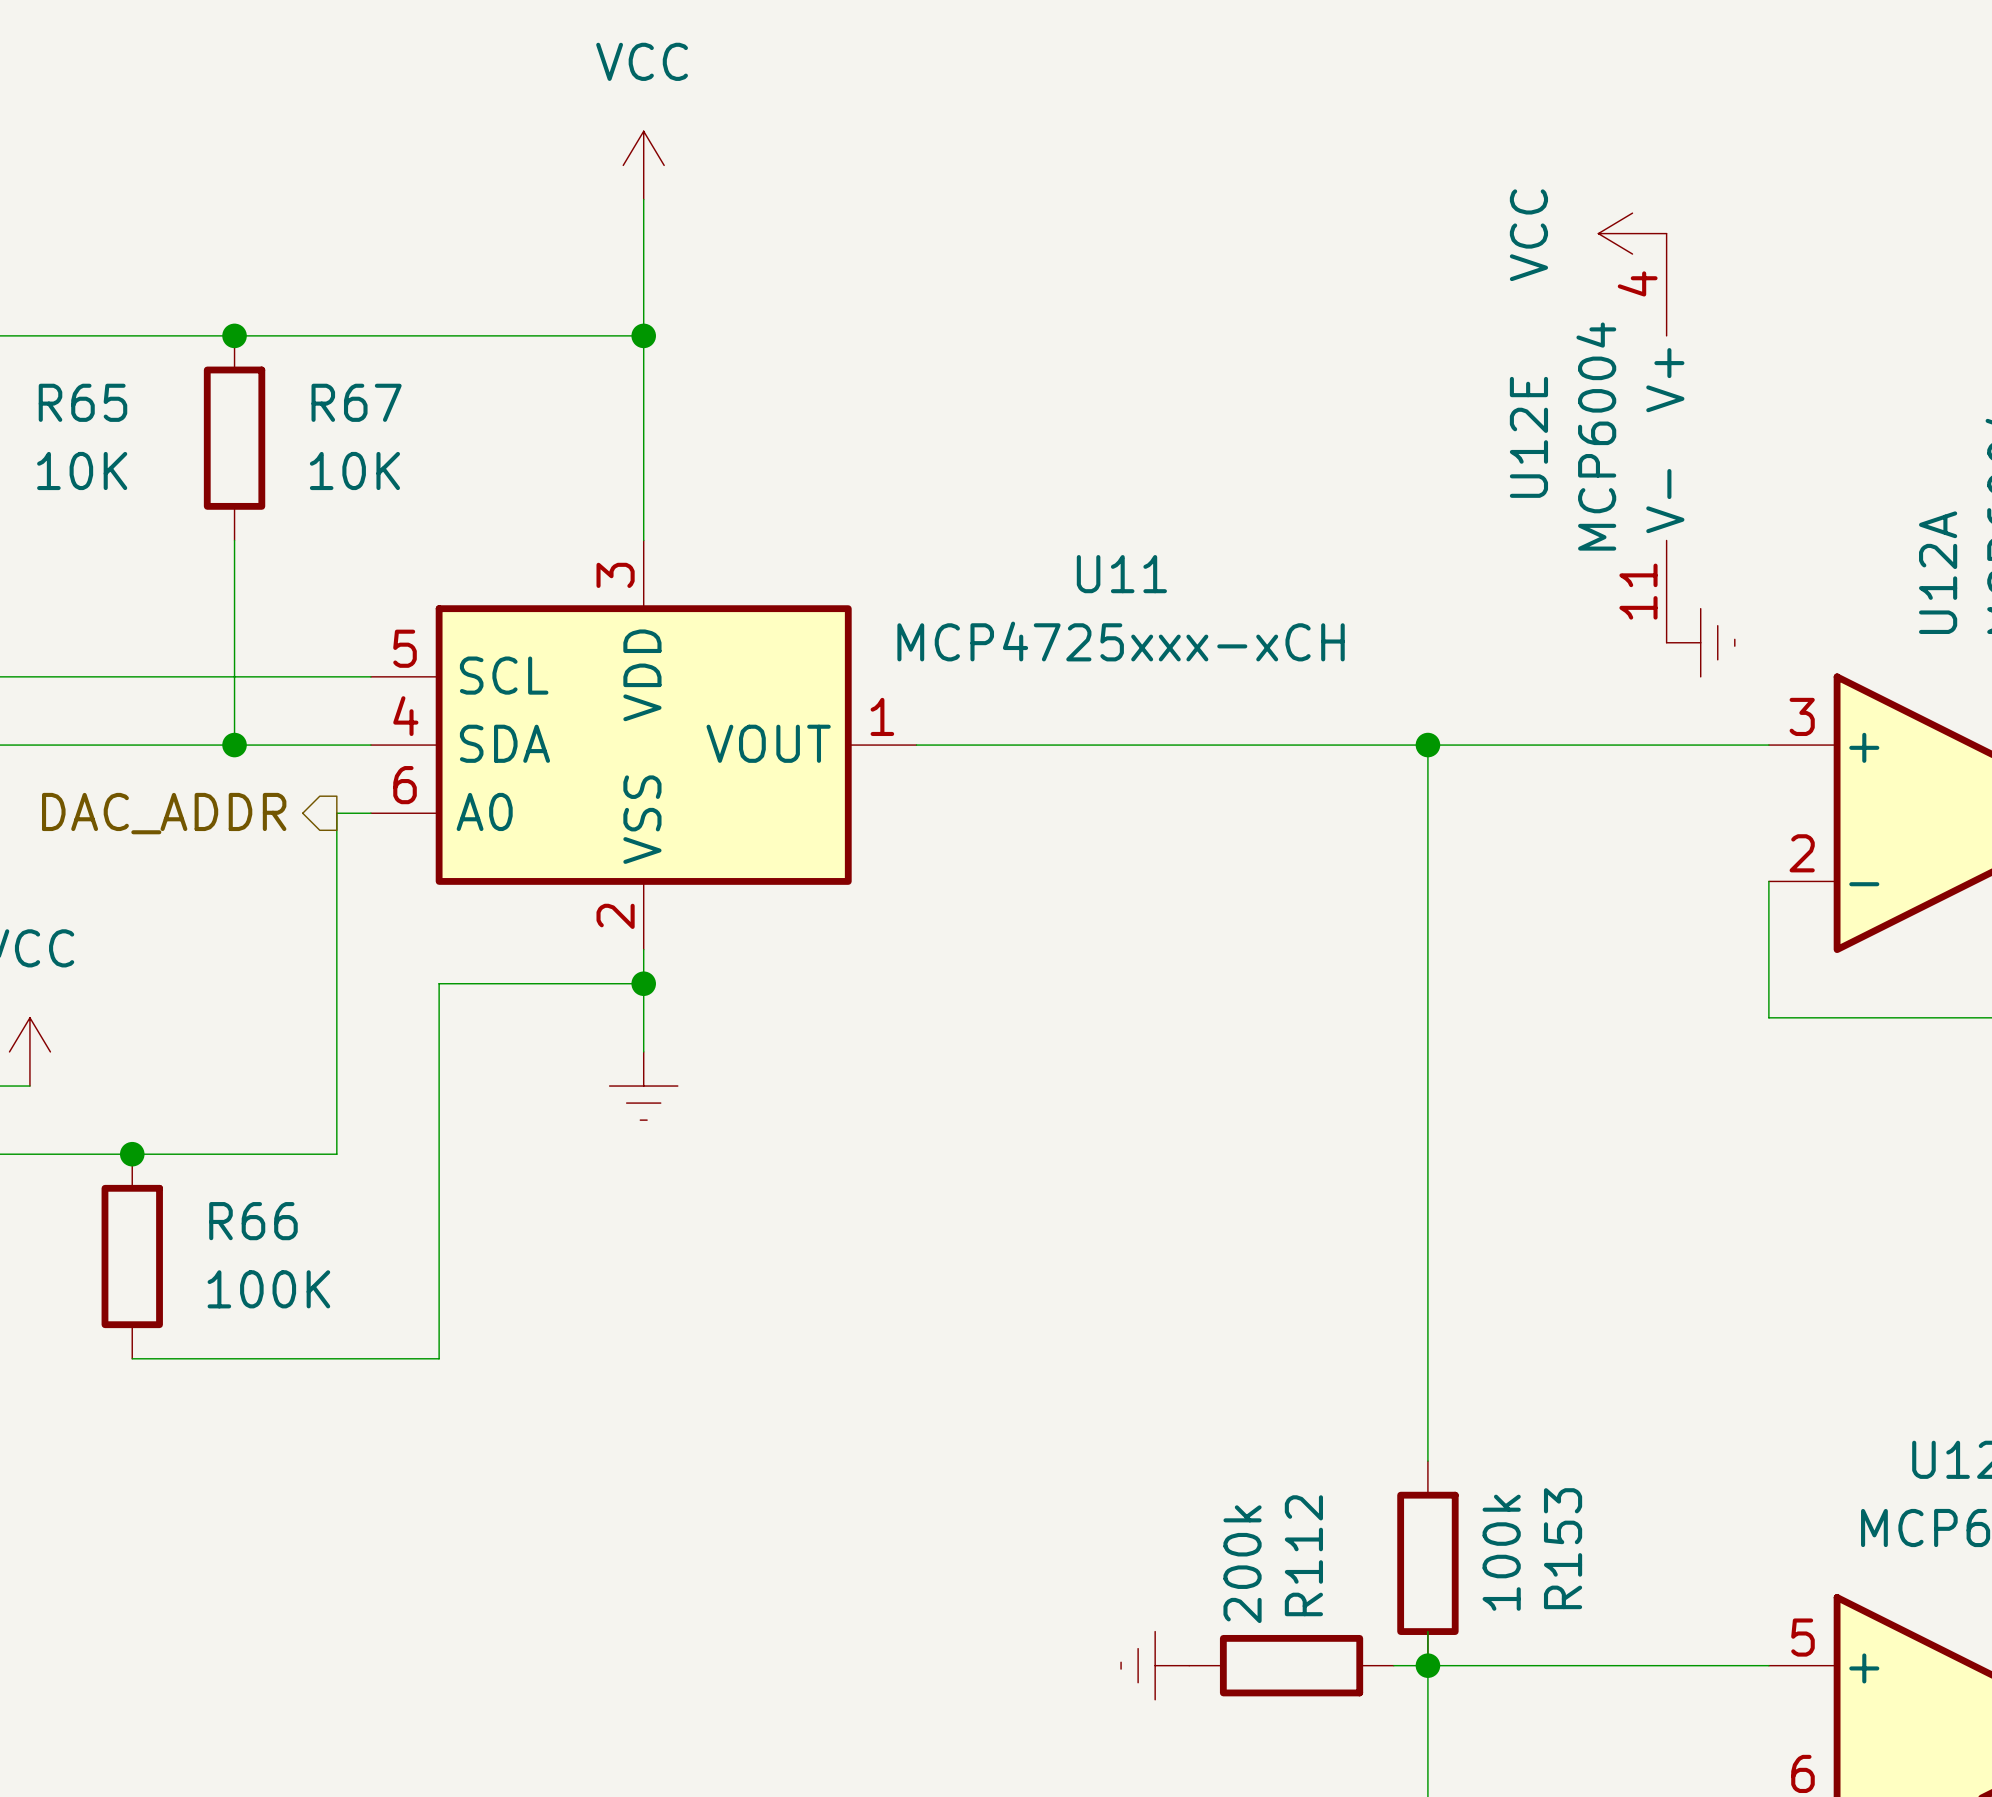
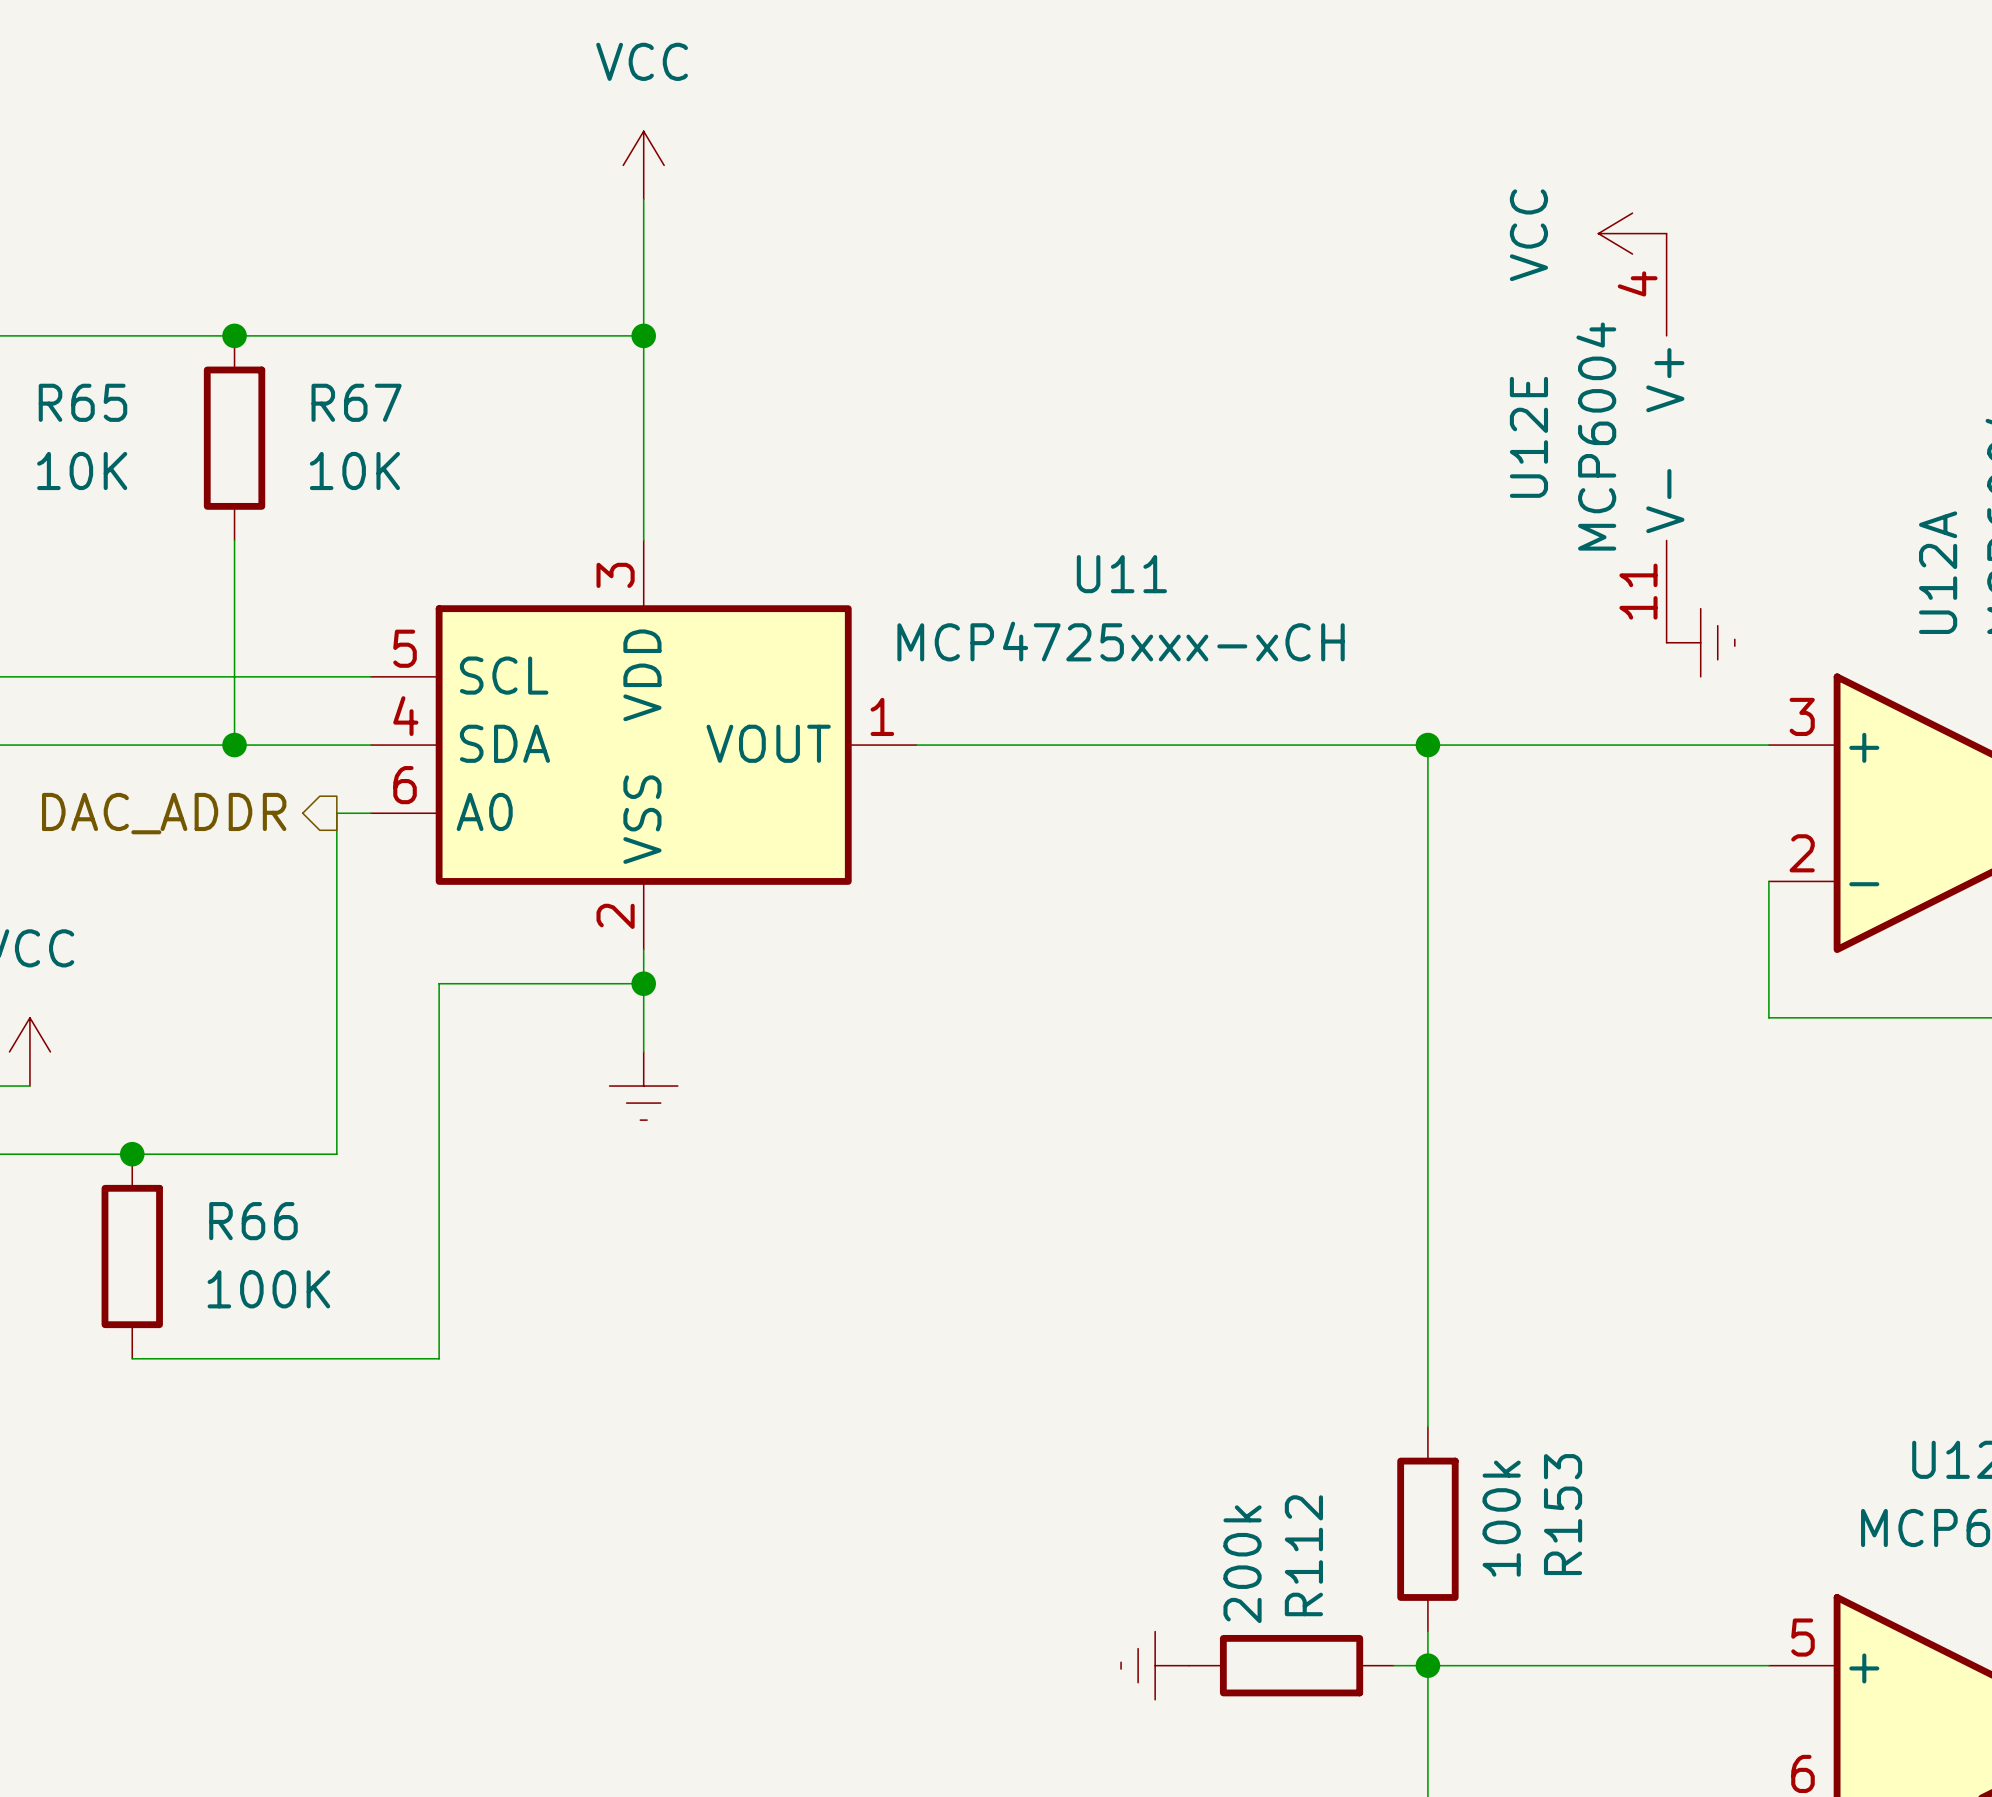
R153 position: (1427, 1563) -> (1427, 1529)

